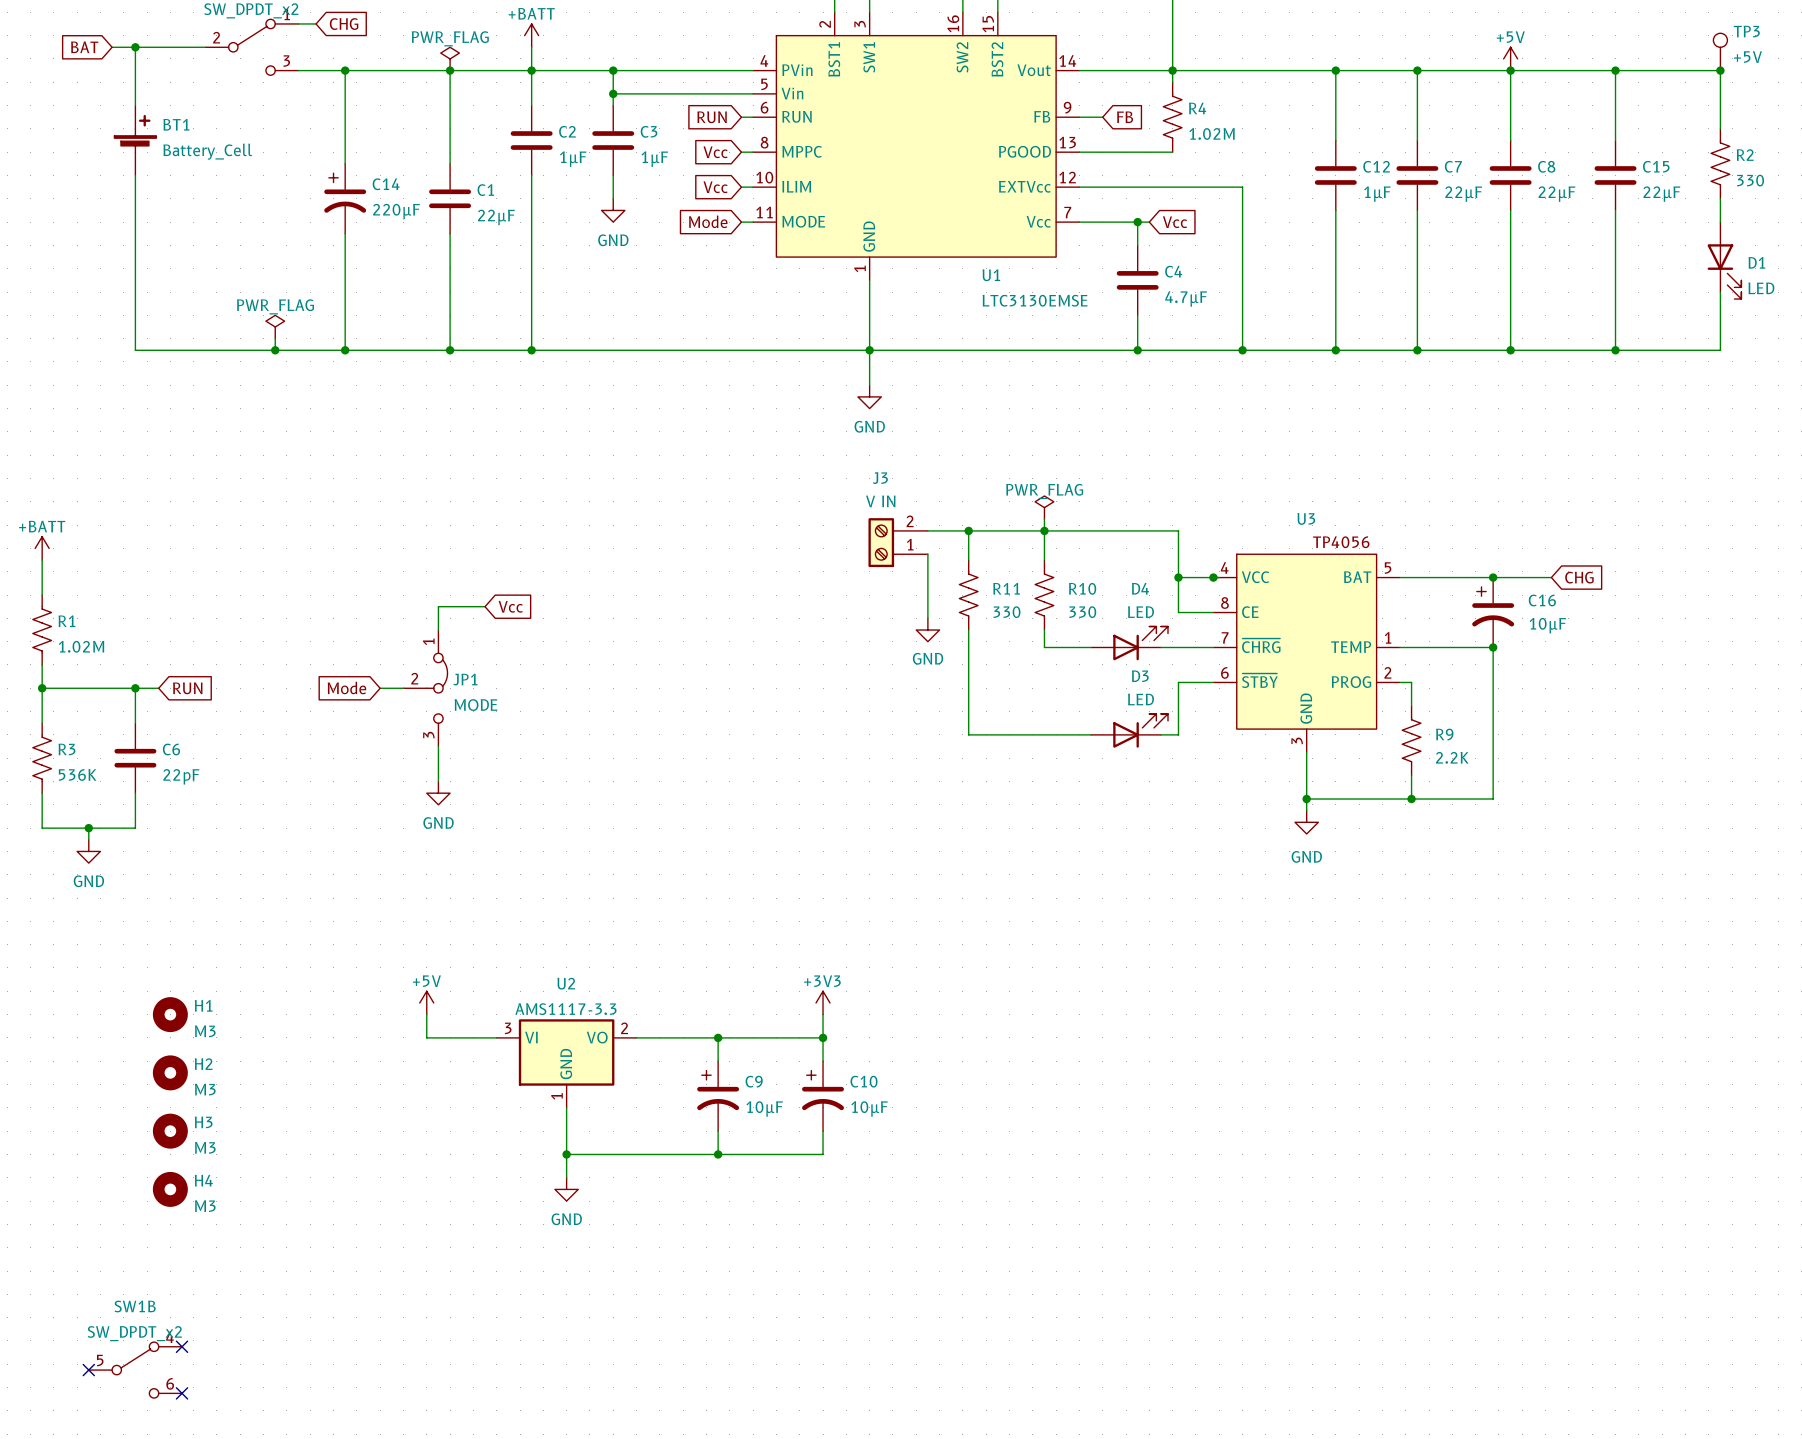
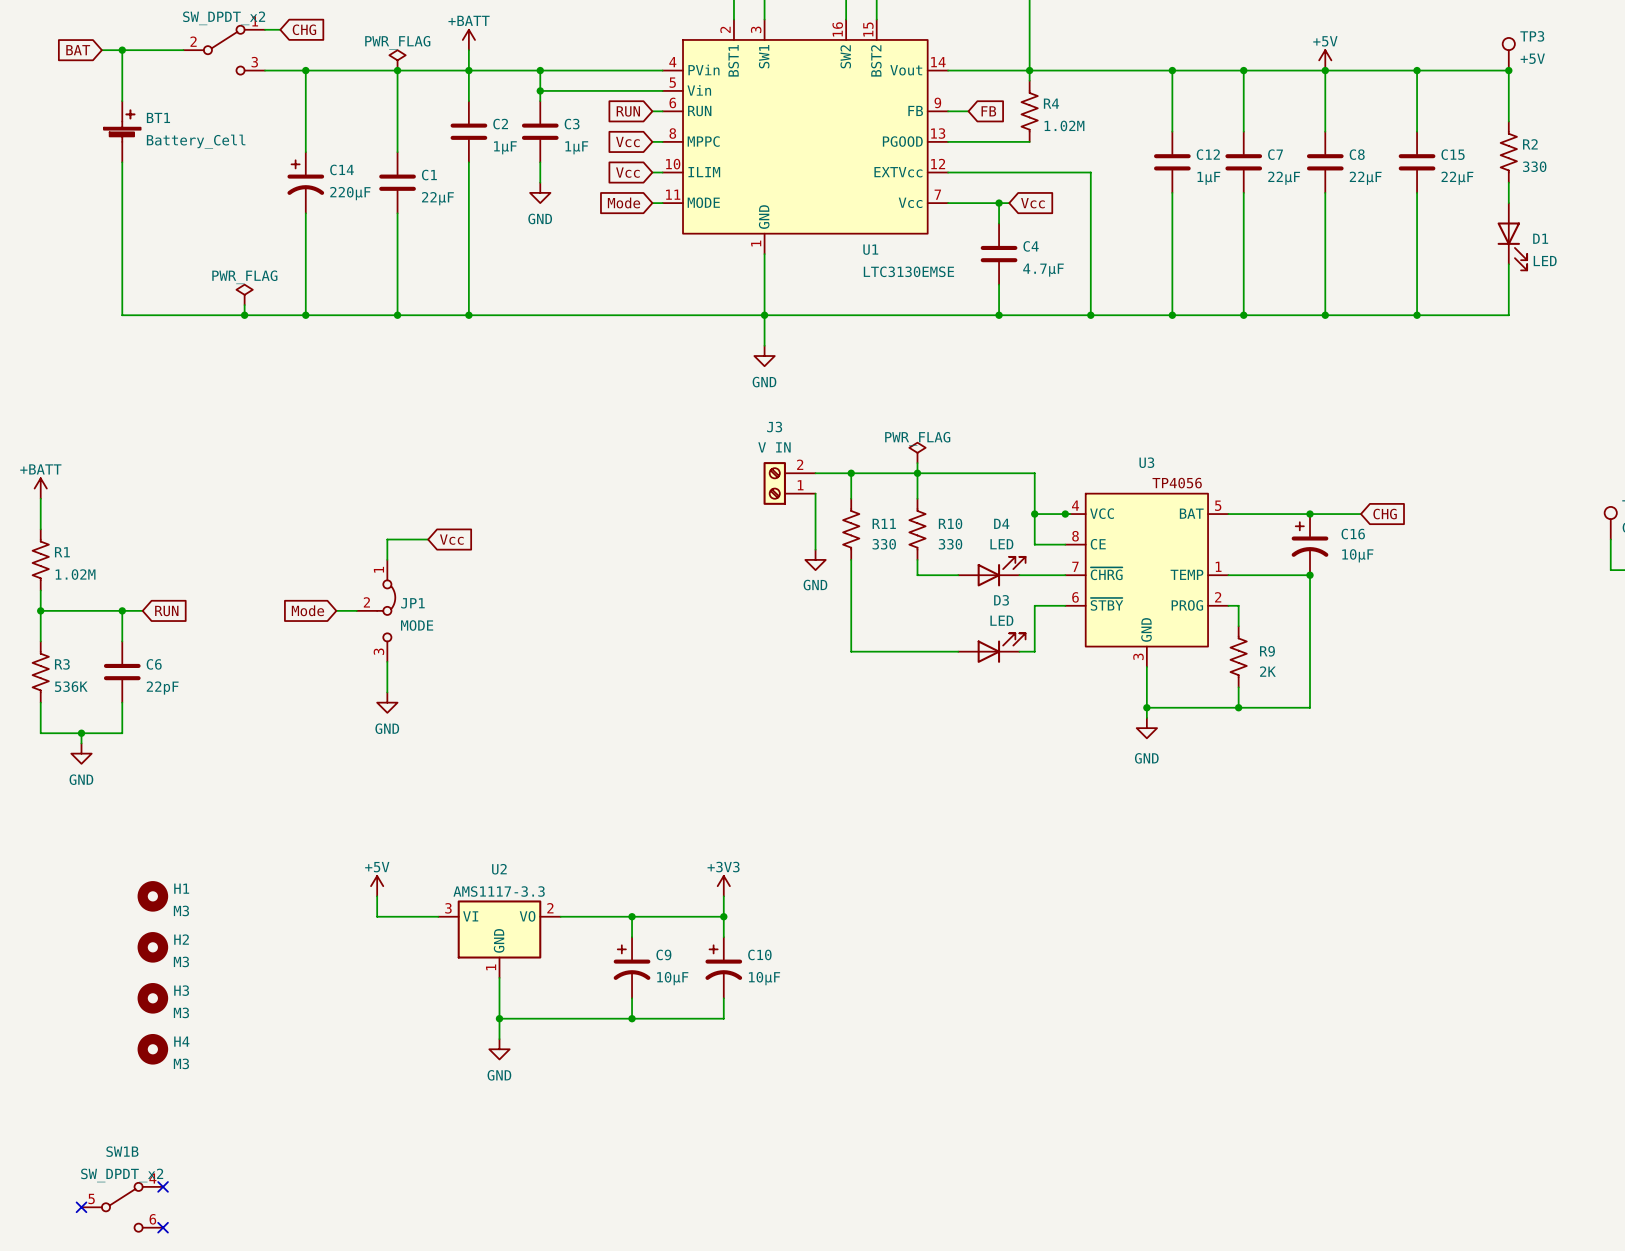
R9 value: 2.2K (1452, 757) -> 2K (1267, 671)

